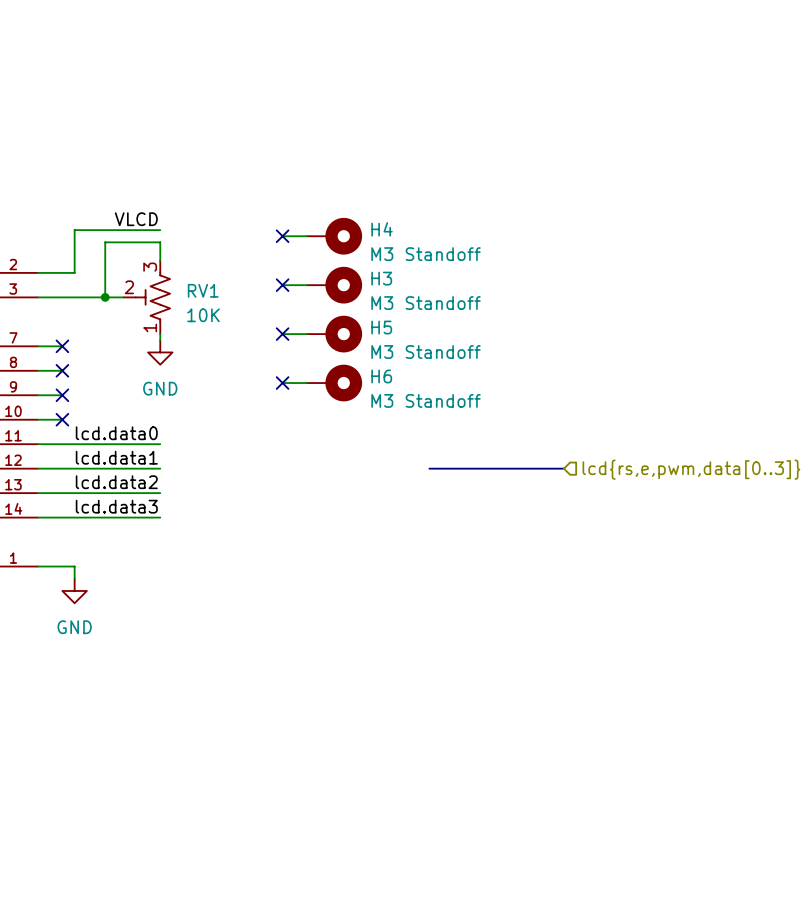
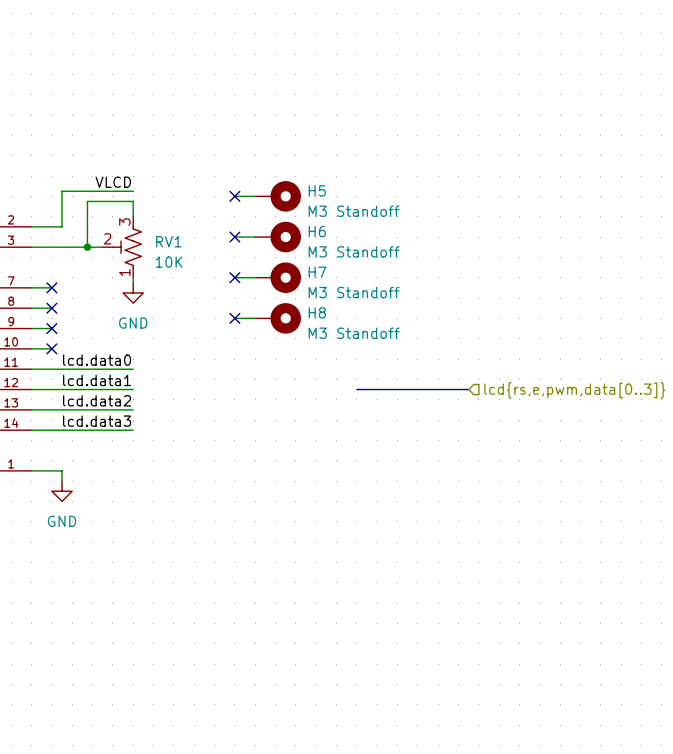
H4 name: H4 (382, 229) -> H5 (317, 190)
H3 name: H3 (381, 278) -> H6 (317, 231)
H5 name: H5 (381, 327) -> H7 (317, 272)
H6 name: H6 (381, 376) -> H8 (317, 312)

